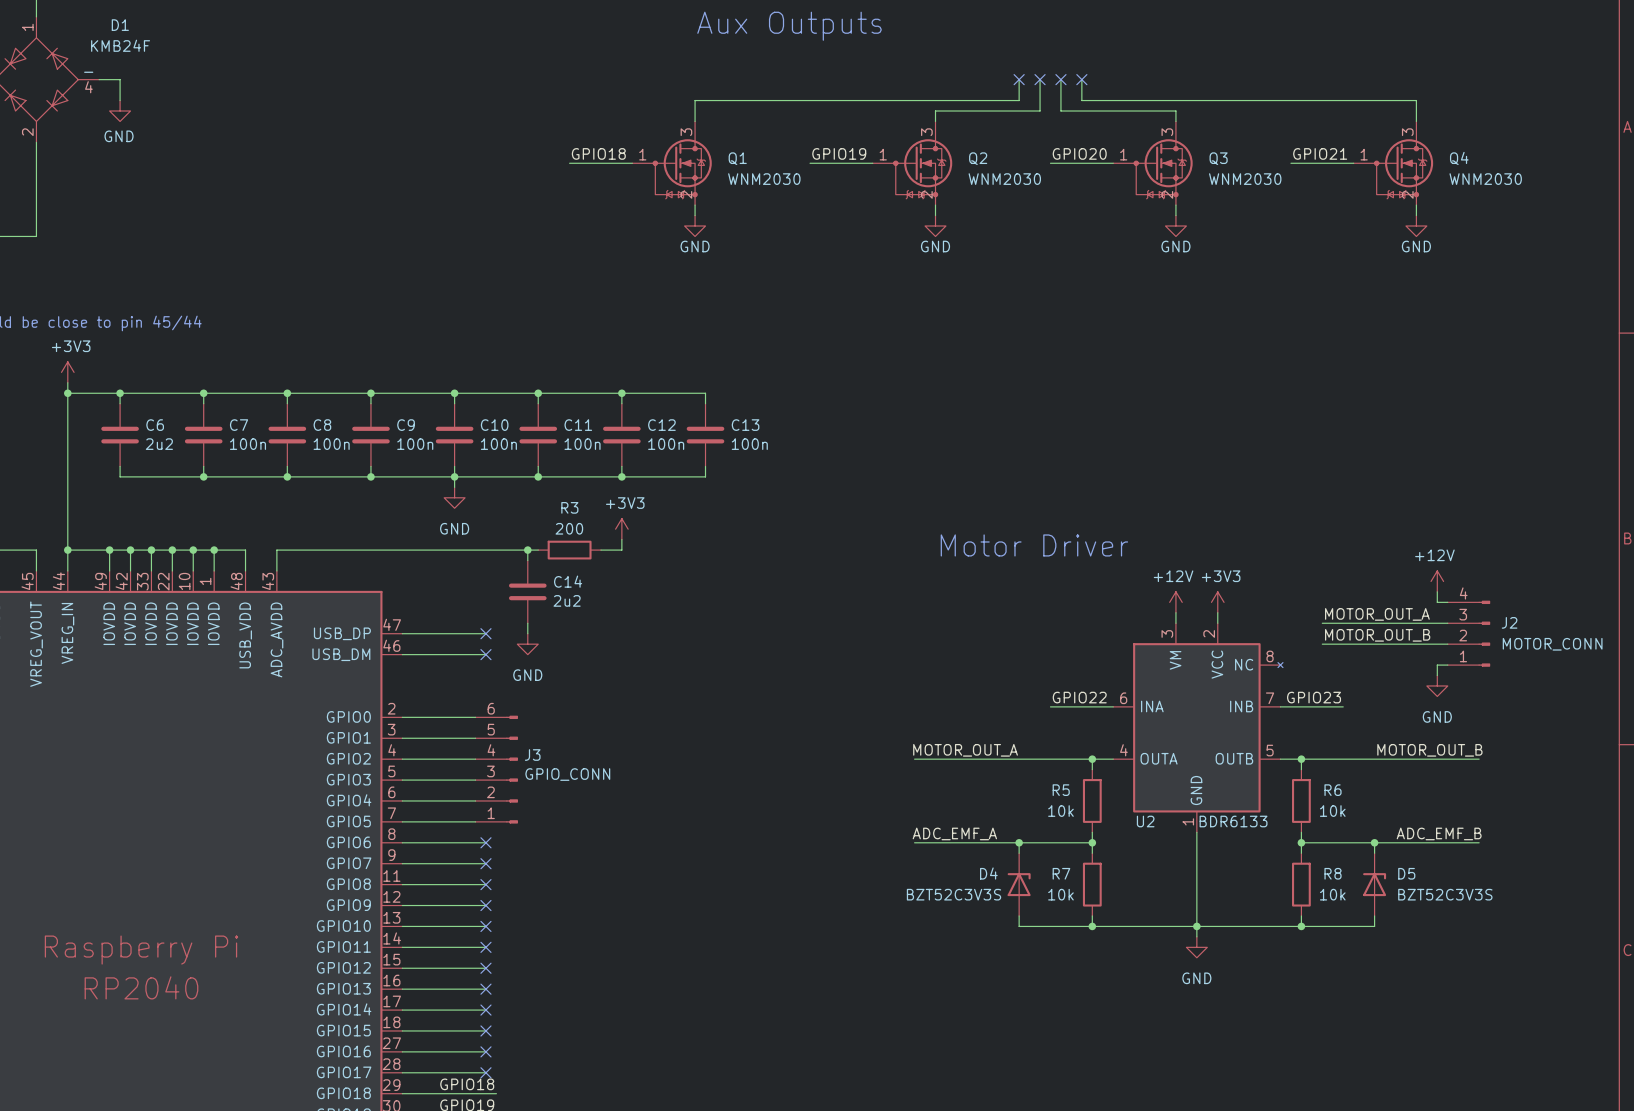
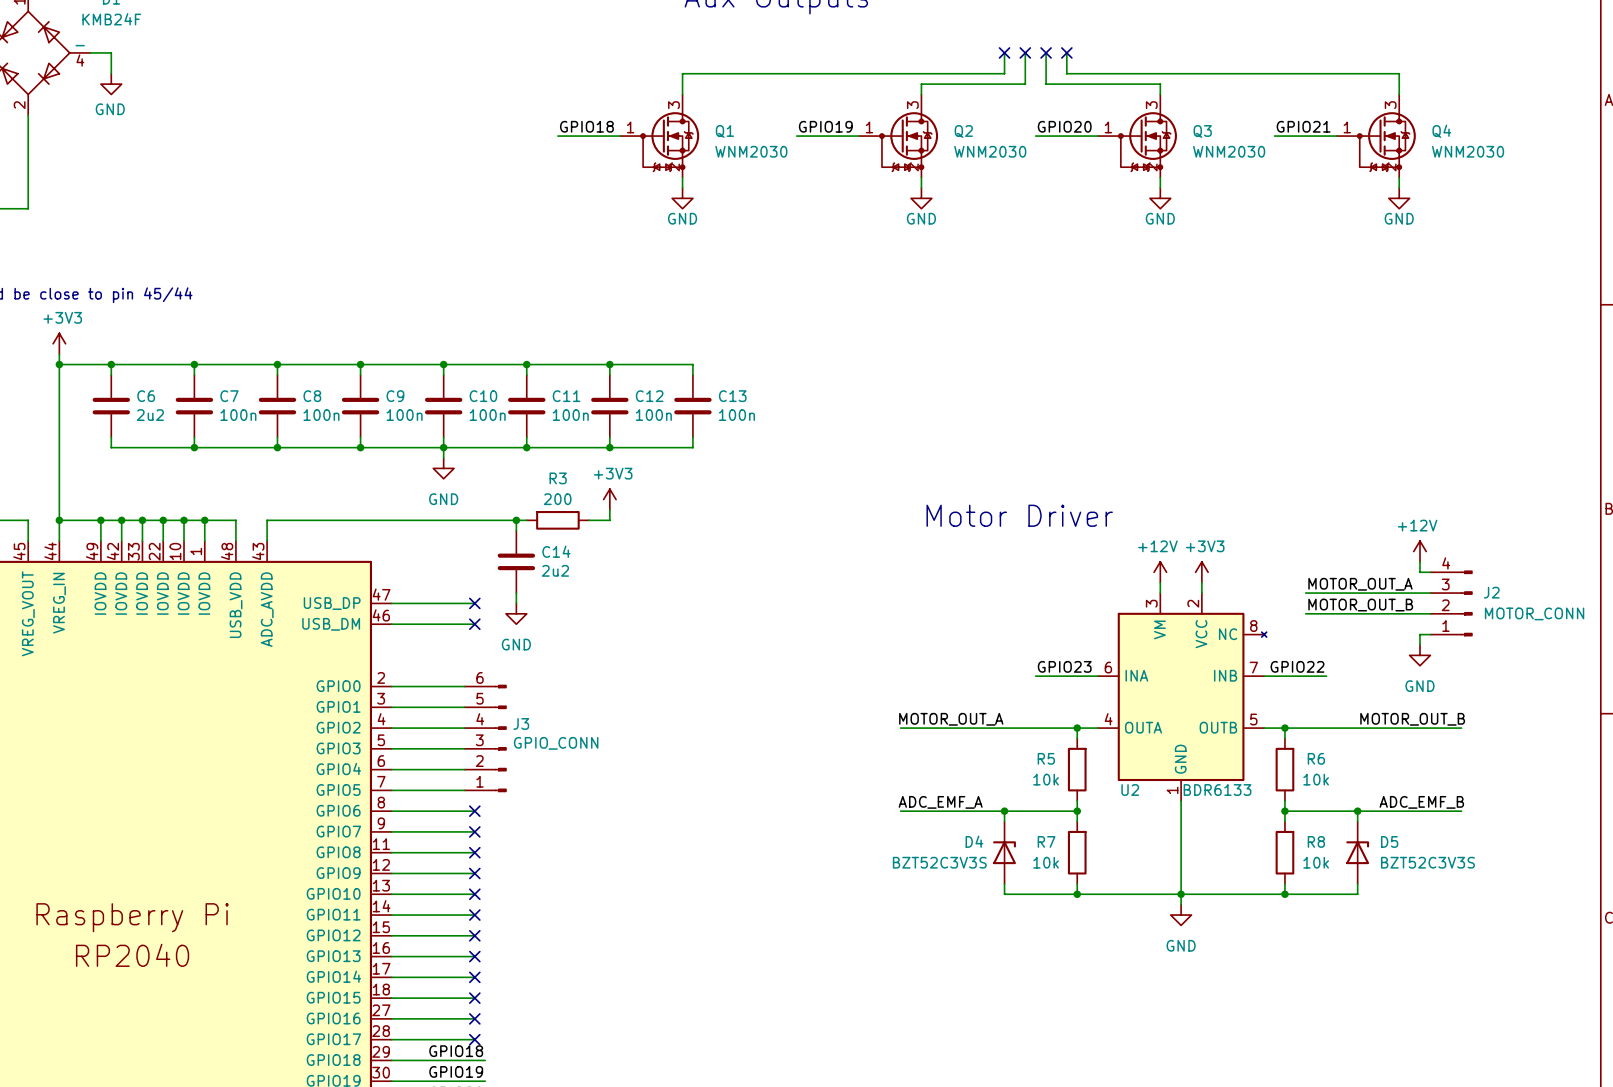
label: GPIO22 (1079, 697) -> GPIO23 (1064, 666)
label: GPIO23 (1314, 697) -> GPIO22 (1297, 666)

